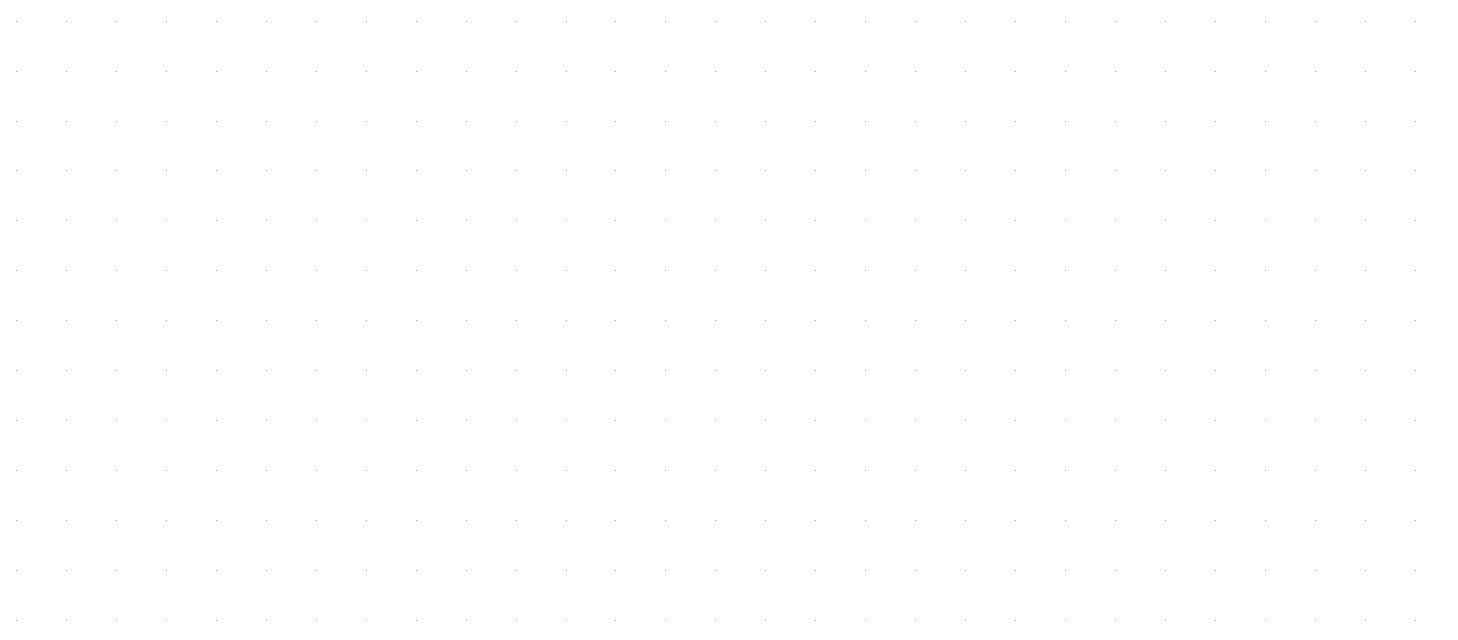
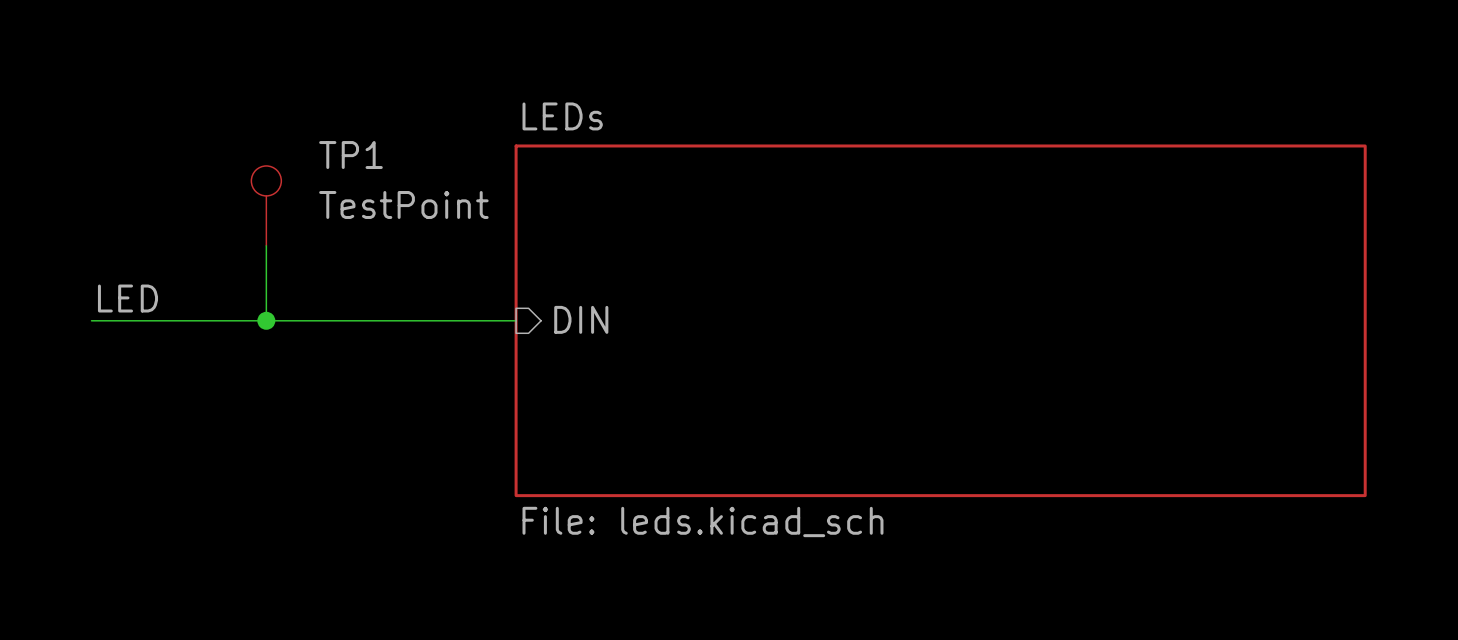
TP1: none -> TestPoint (266, 205)
wire: none -> (266, 245) (266, 320)
label: none -> LED (127, 298)
sheet pin: none -> DIN (581, 319)
wire: none -> (91, 320) (516, 320)
junction: none -> (266, 320)
sheet LEDs: none -> File: leds.kicad_sch (940, 320)

